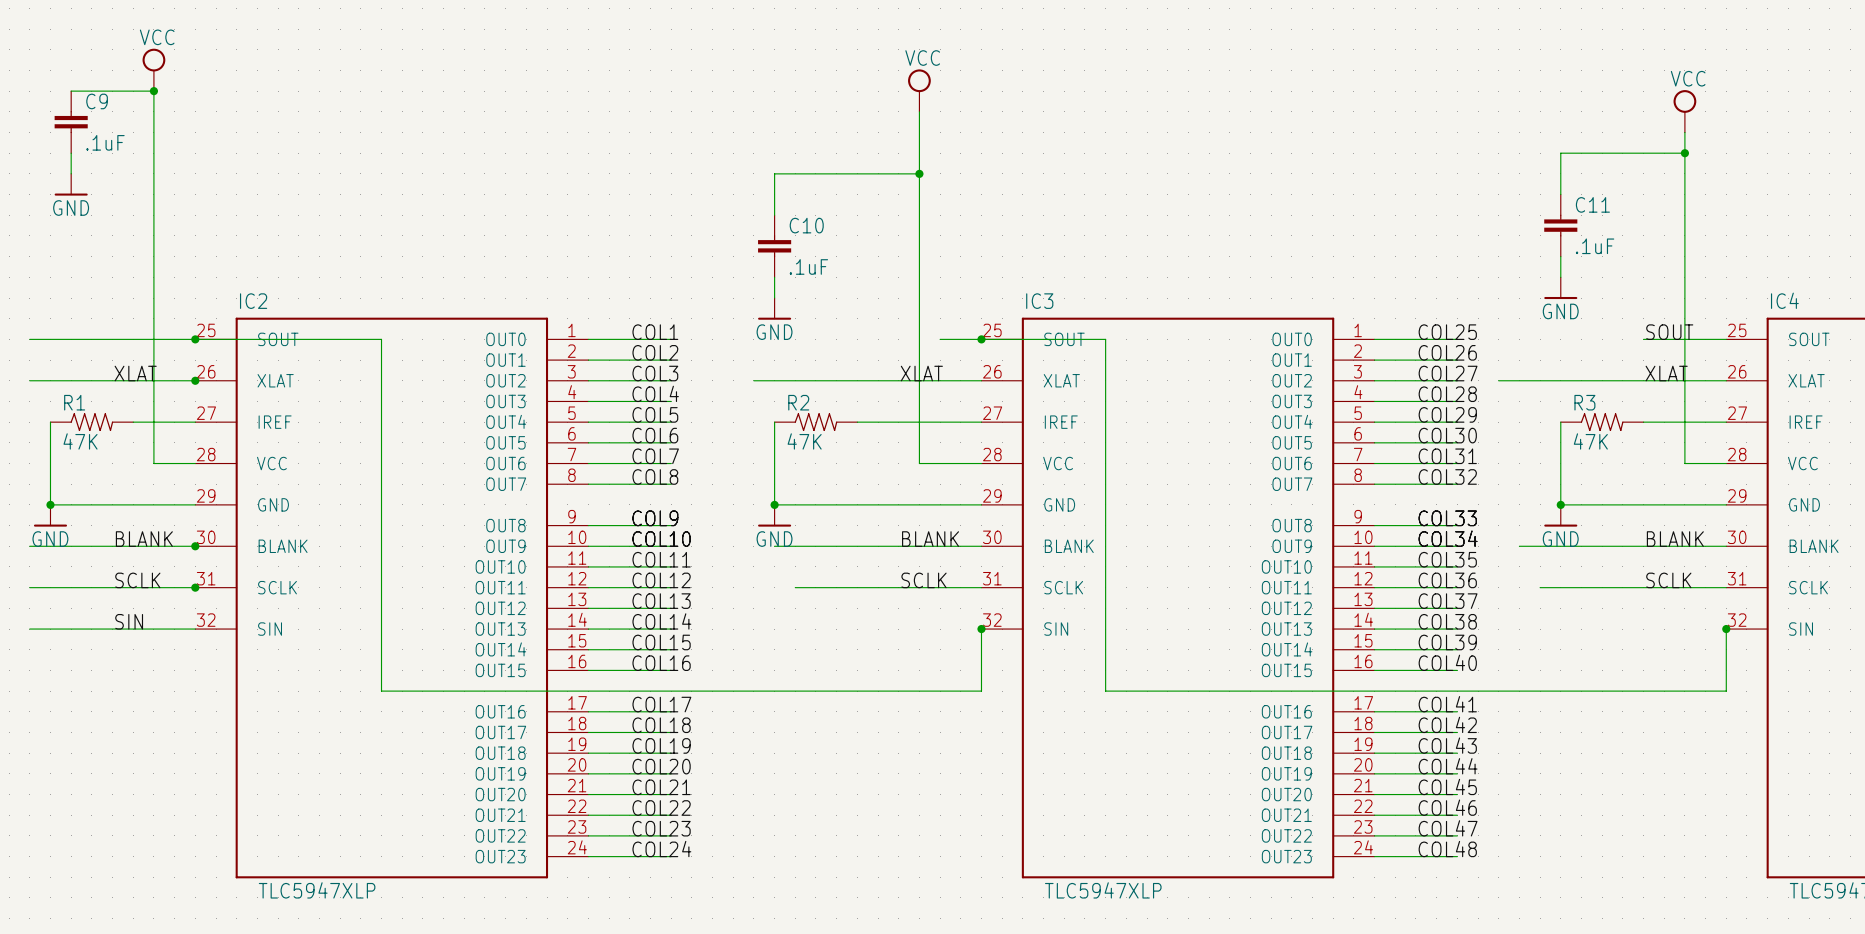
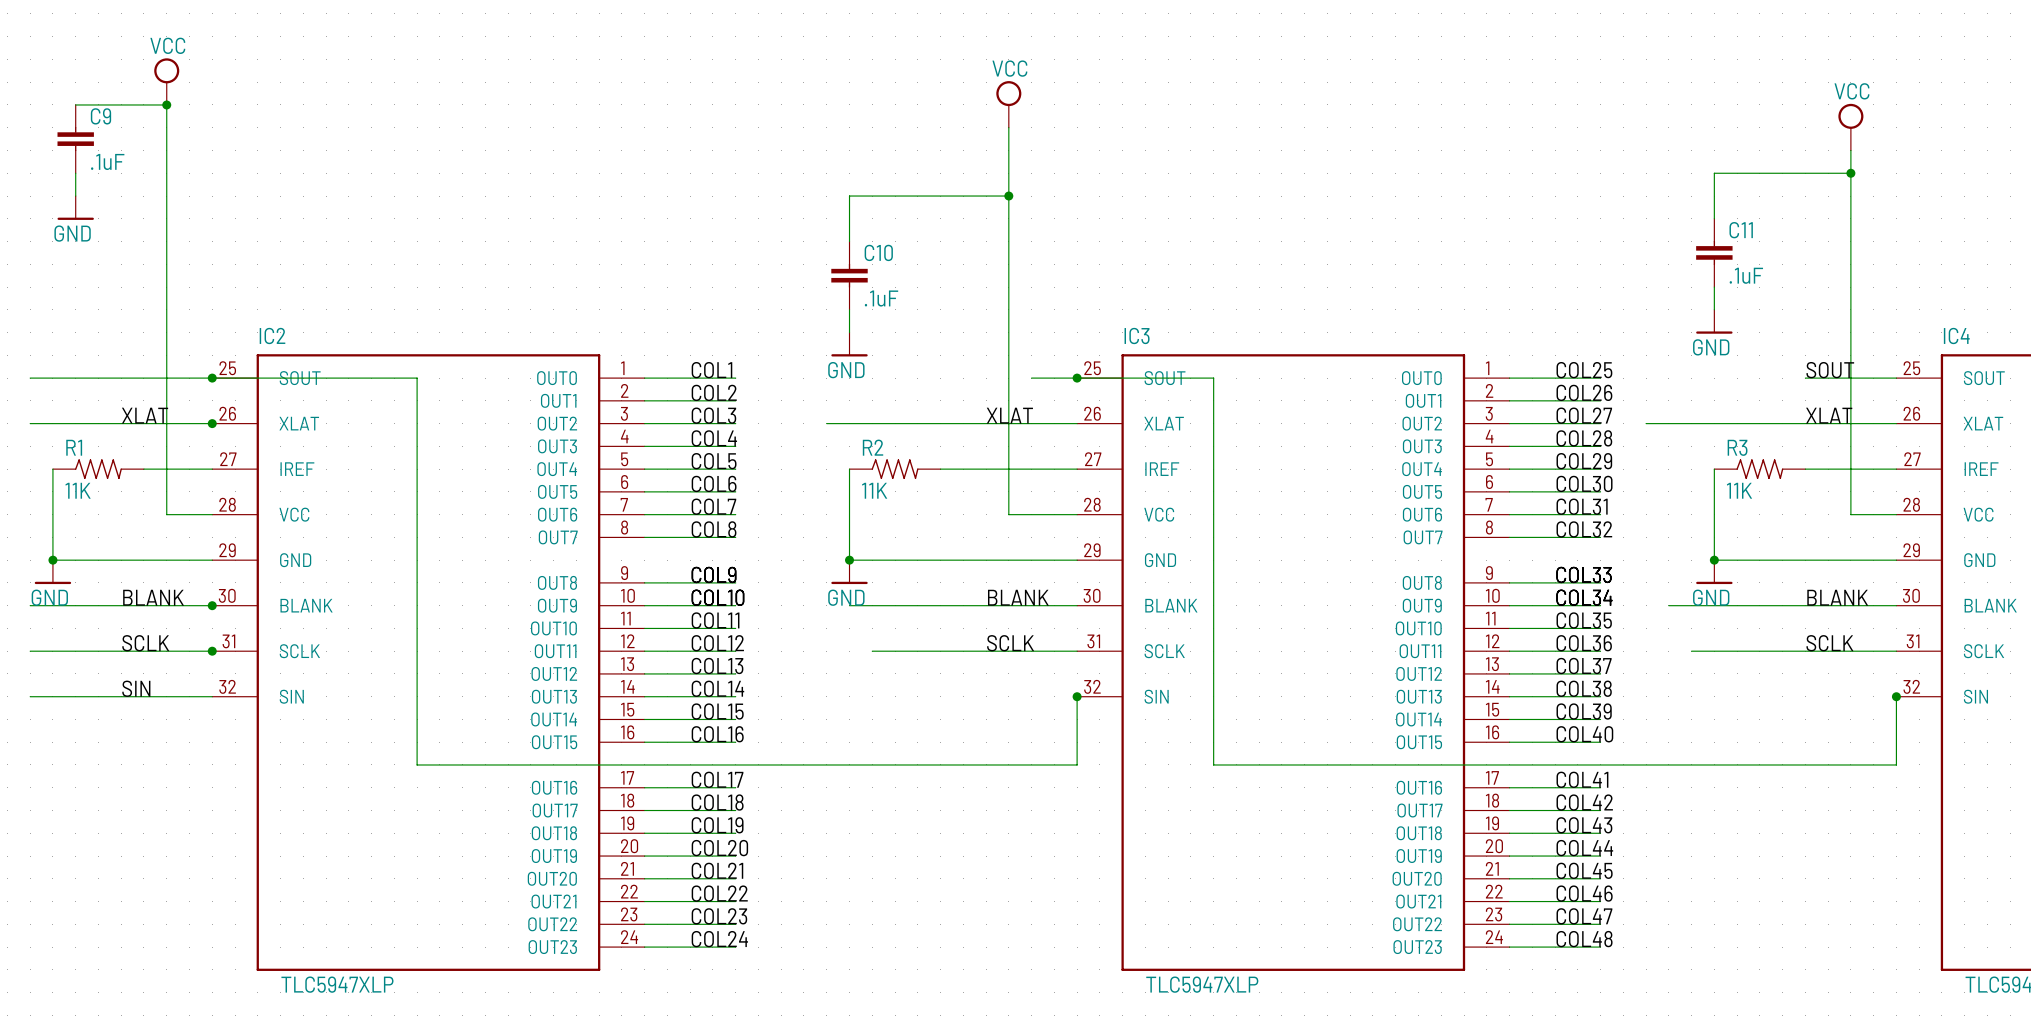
R1 value: 47K (80, 441) -> 11K (78, 490)
R2 value: 47K (804, 441) -> 11K (874, 490)
R3 value: 47K (1590, 441) -> 11K (1739, 490)

